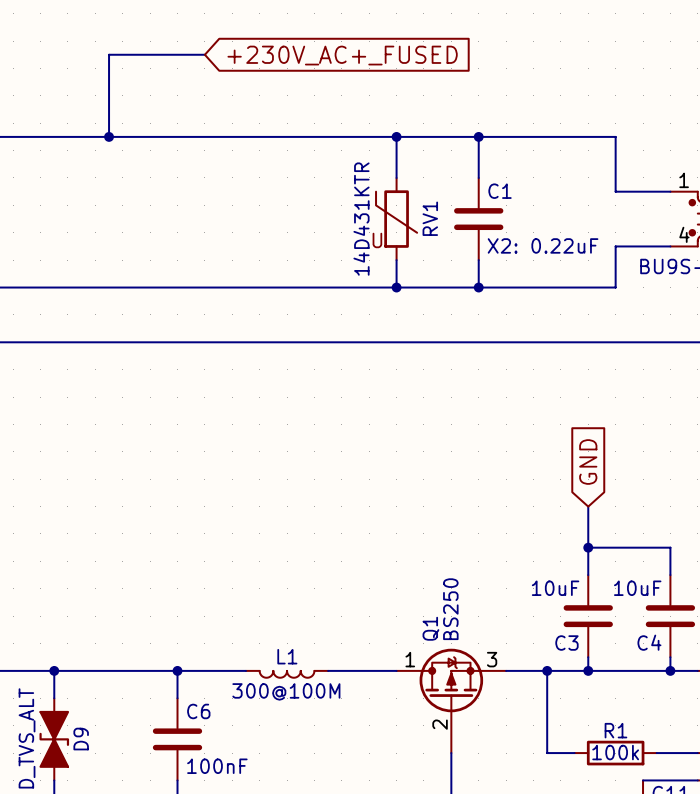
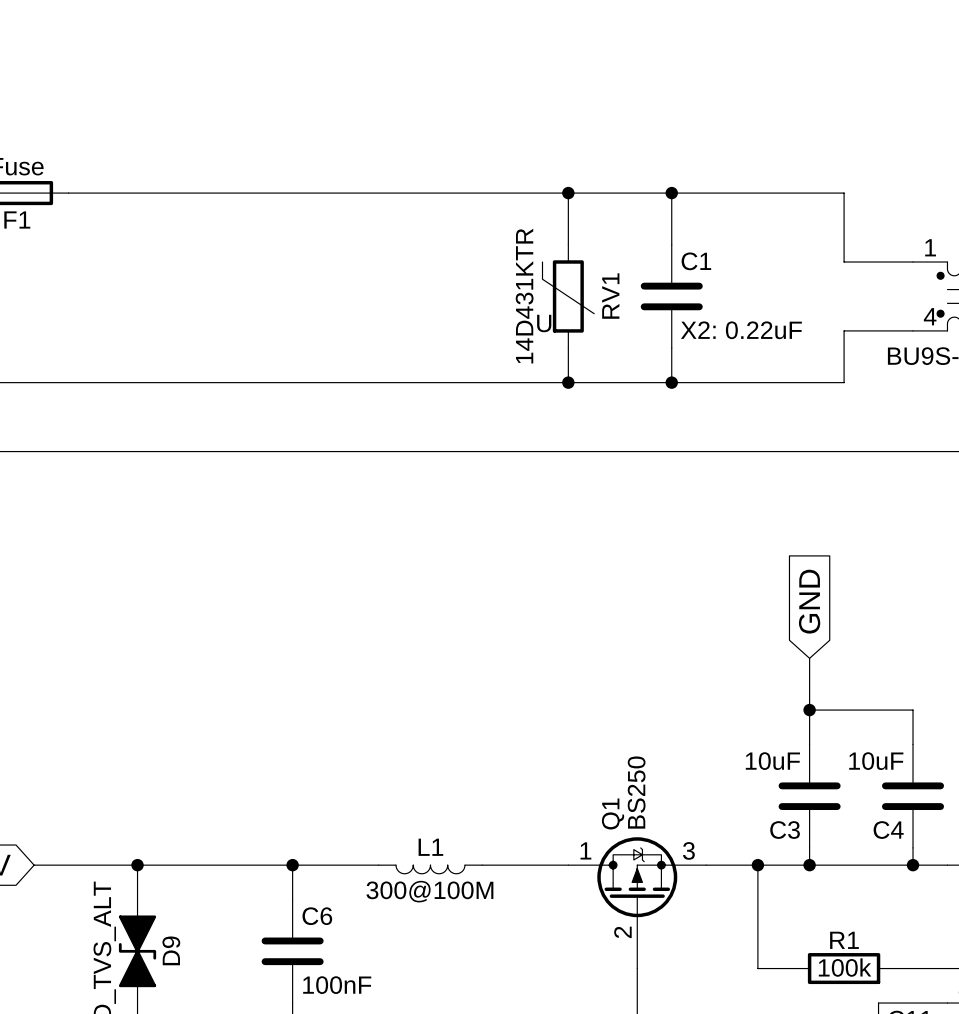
wire: (204, 54) (109, 54) (109, 136) -> none
global label: +230V_AC+_FUSED (342, 55) -> none
junction: (109, 136) -> none

